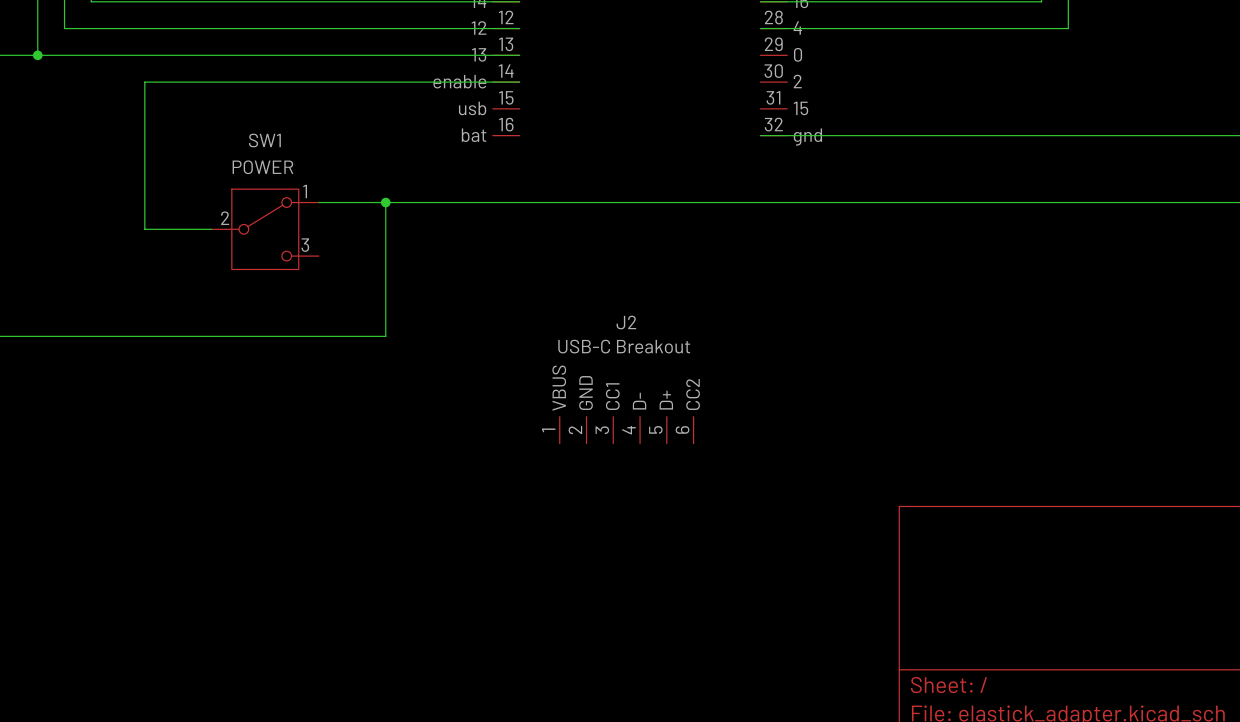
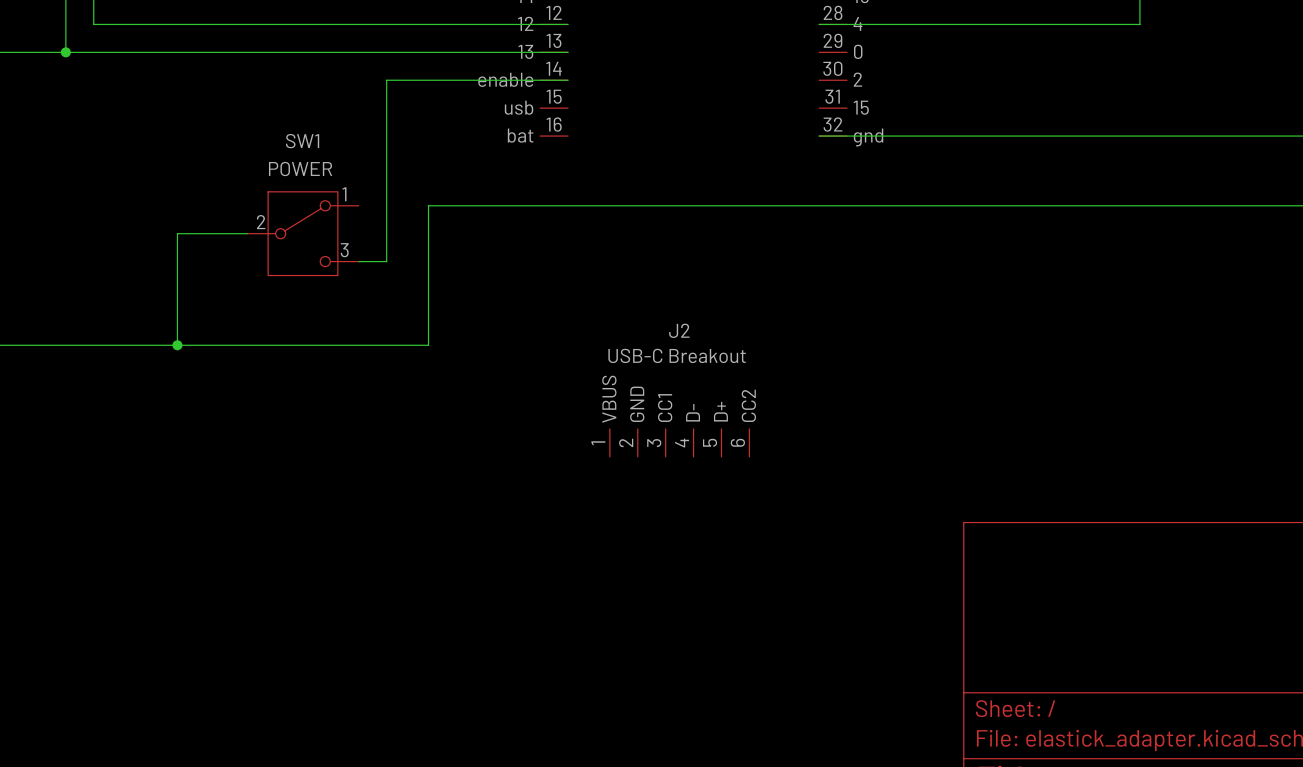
wire: (345, 82) (144, 82) (144, 229) -> (386, 80) (386, 261) (358, 261)
wire: (318, 202) (385, 202) -> none
junction: (385, 202) -> none
wire: none -> (177, 233) (177, 345)
junction: none -> (177, 345)

